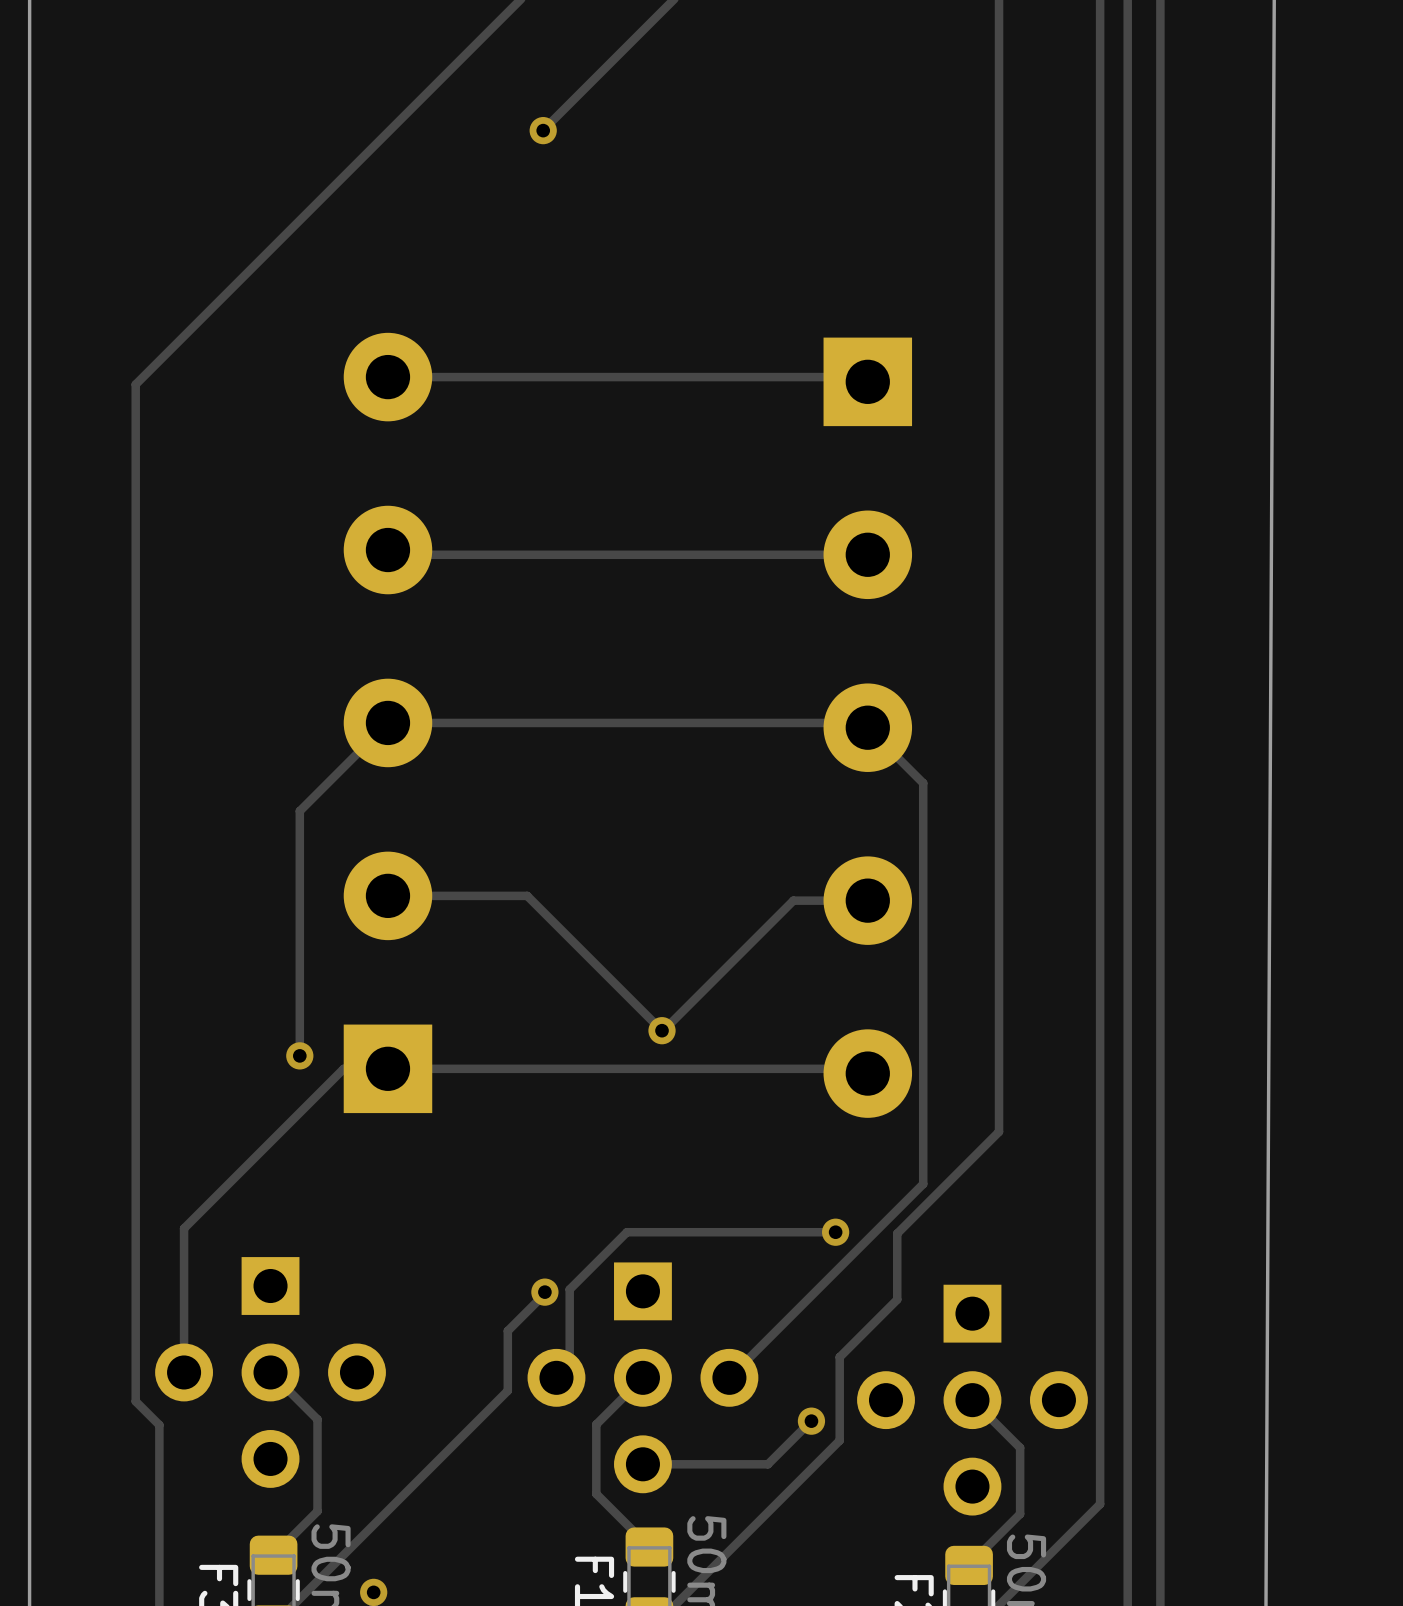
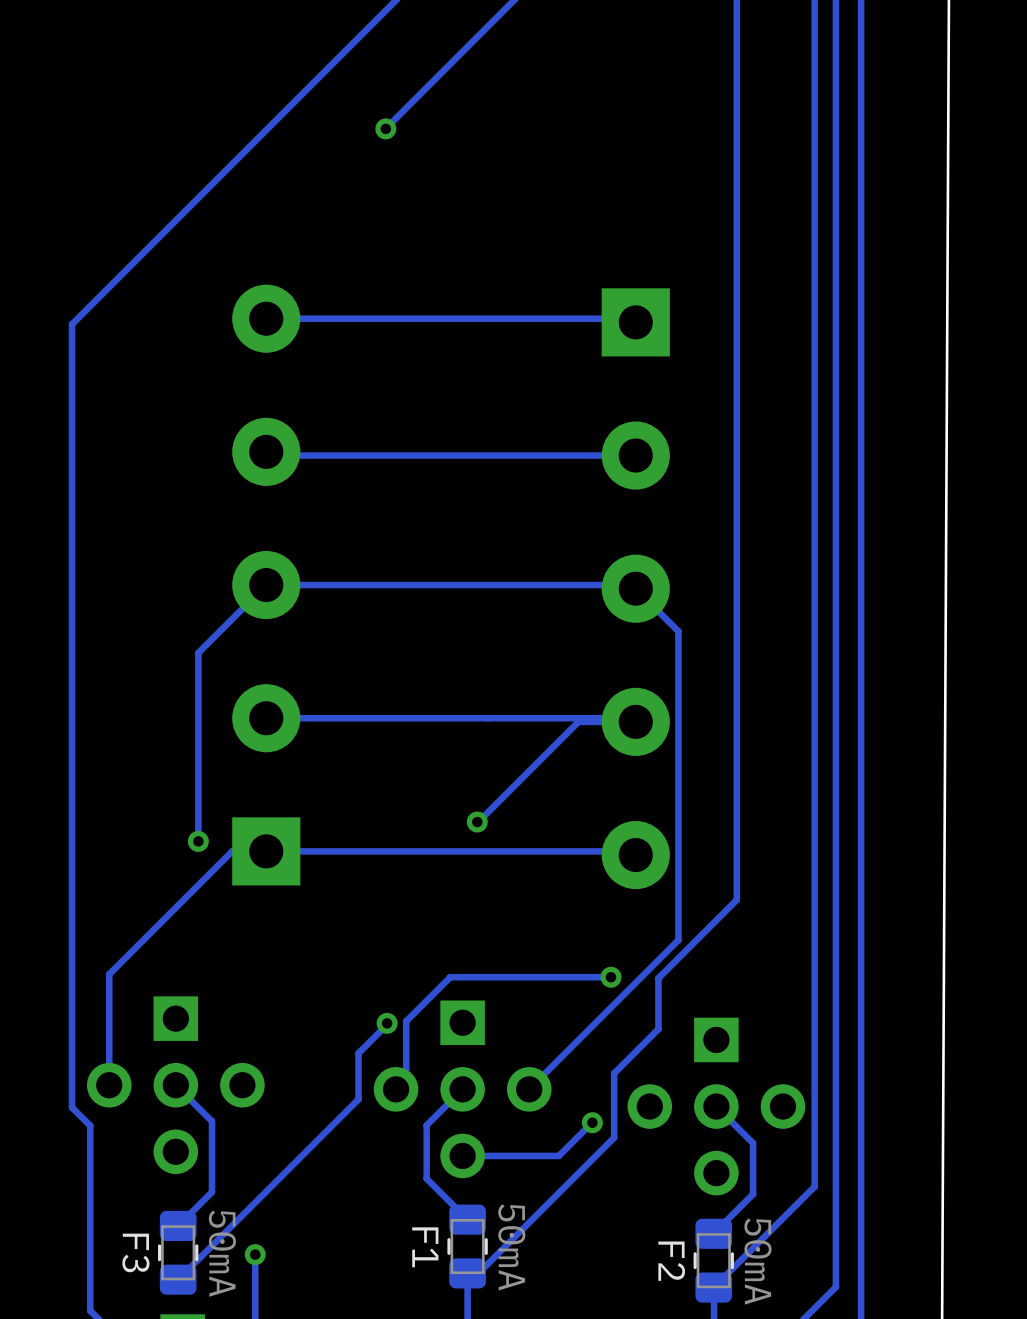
track: (527, 895) (662, 1030) -> (373, 718) (632, 718)

